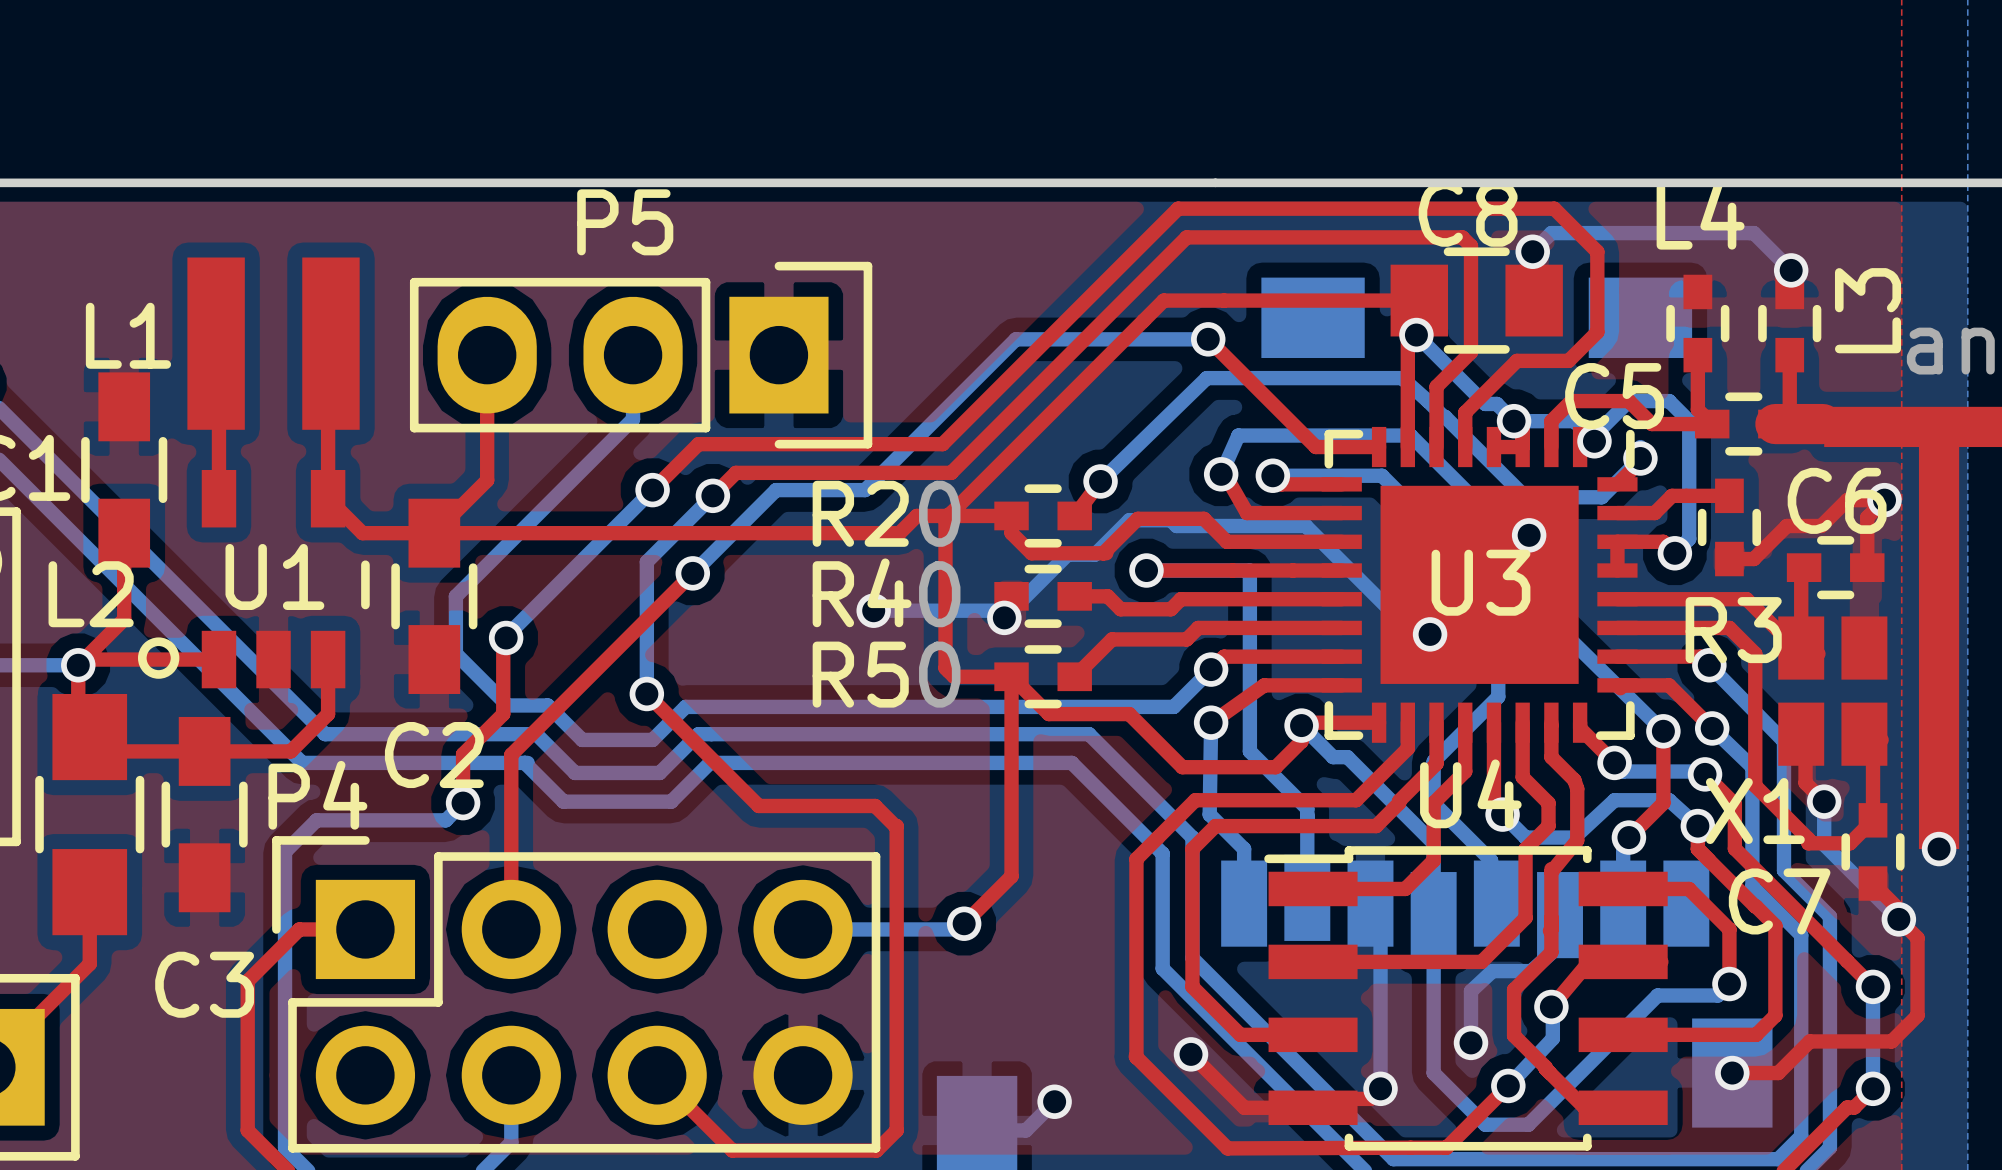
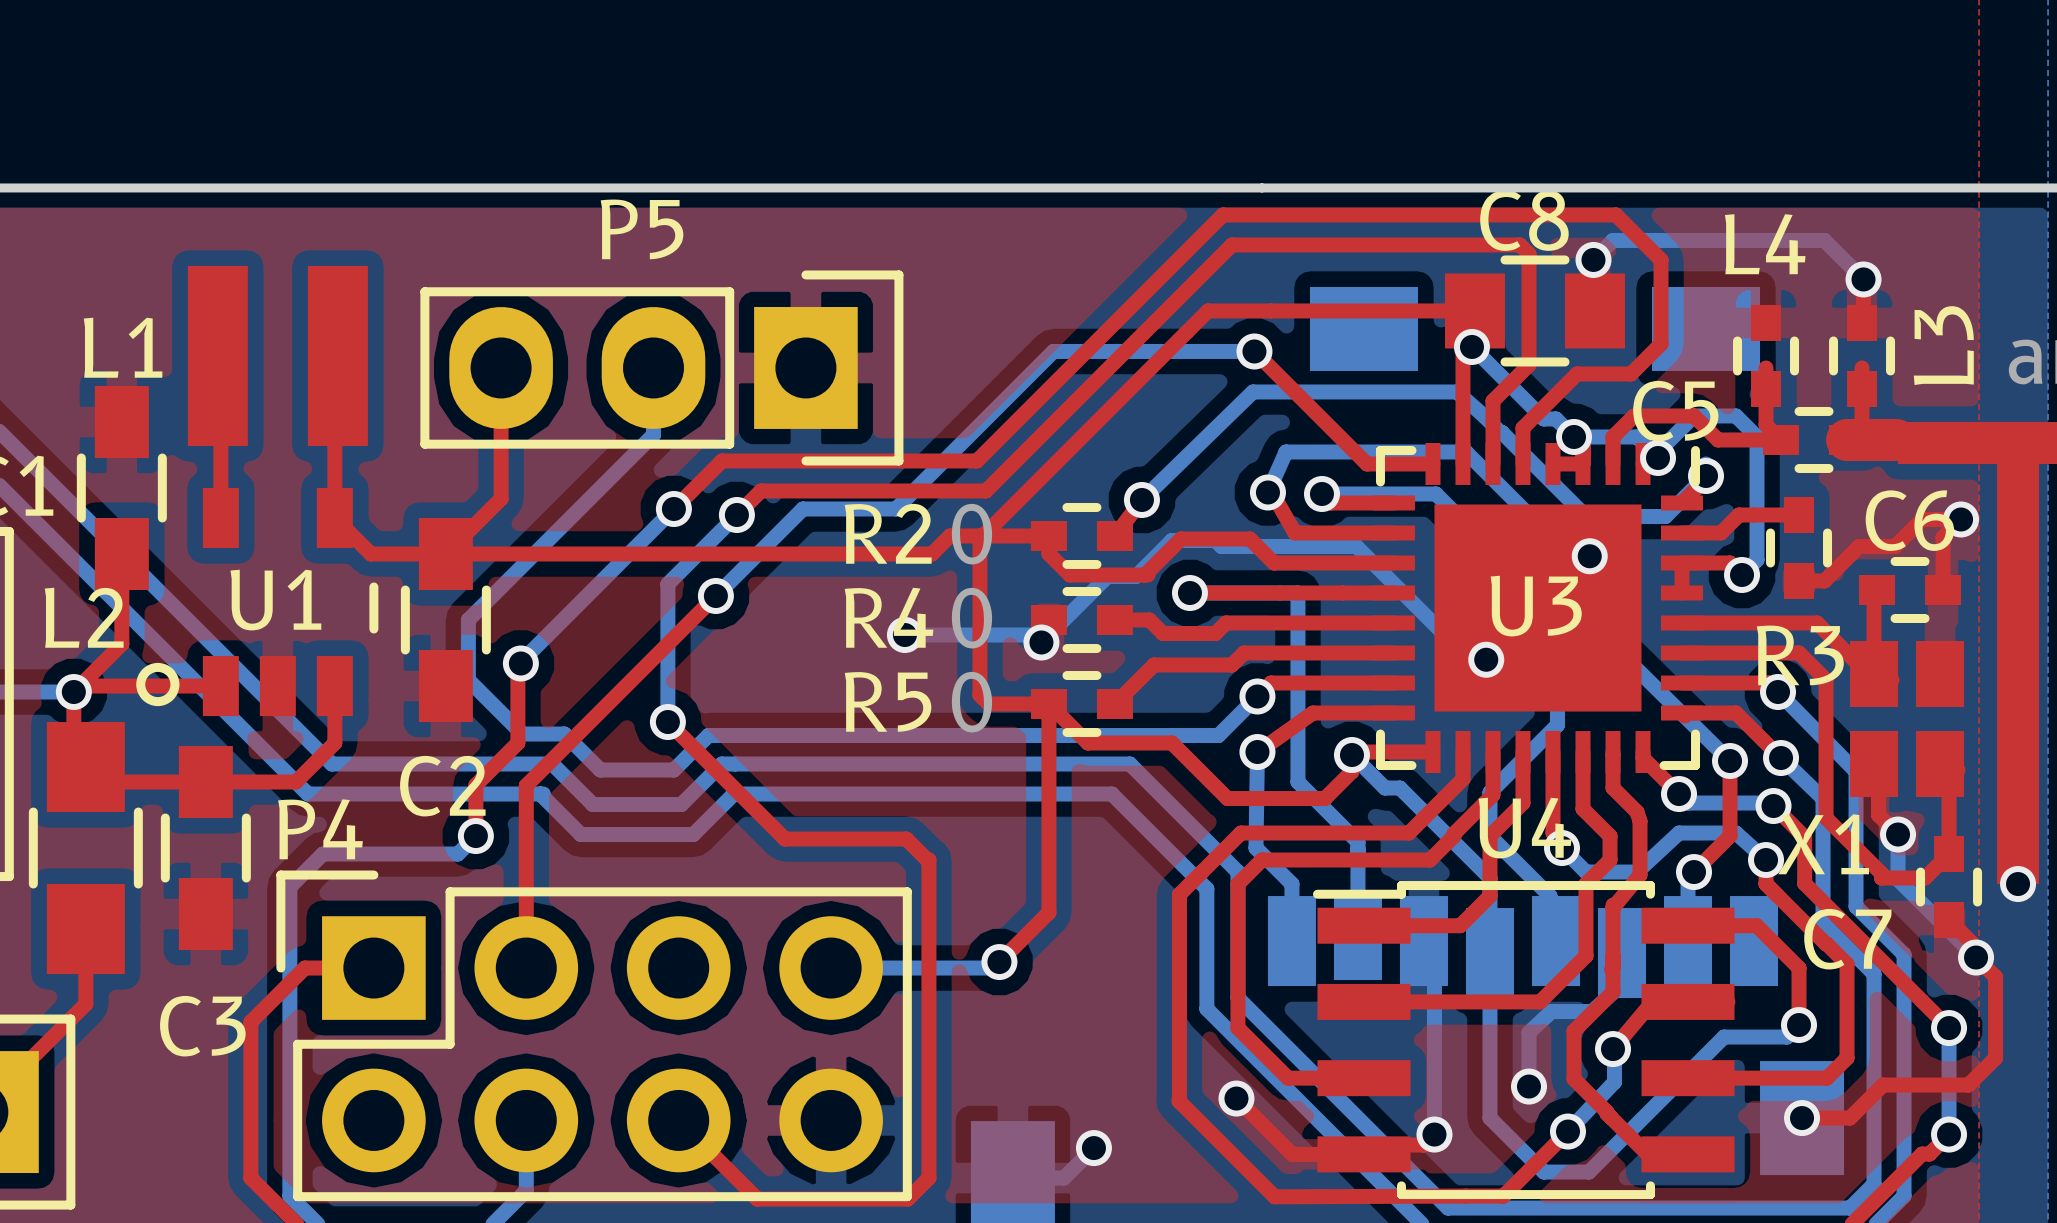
L4 position: (1697, 323) -> (1766, 355)
L3 position: (1789, 323) -> (1862, 355)

